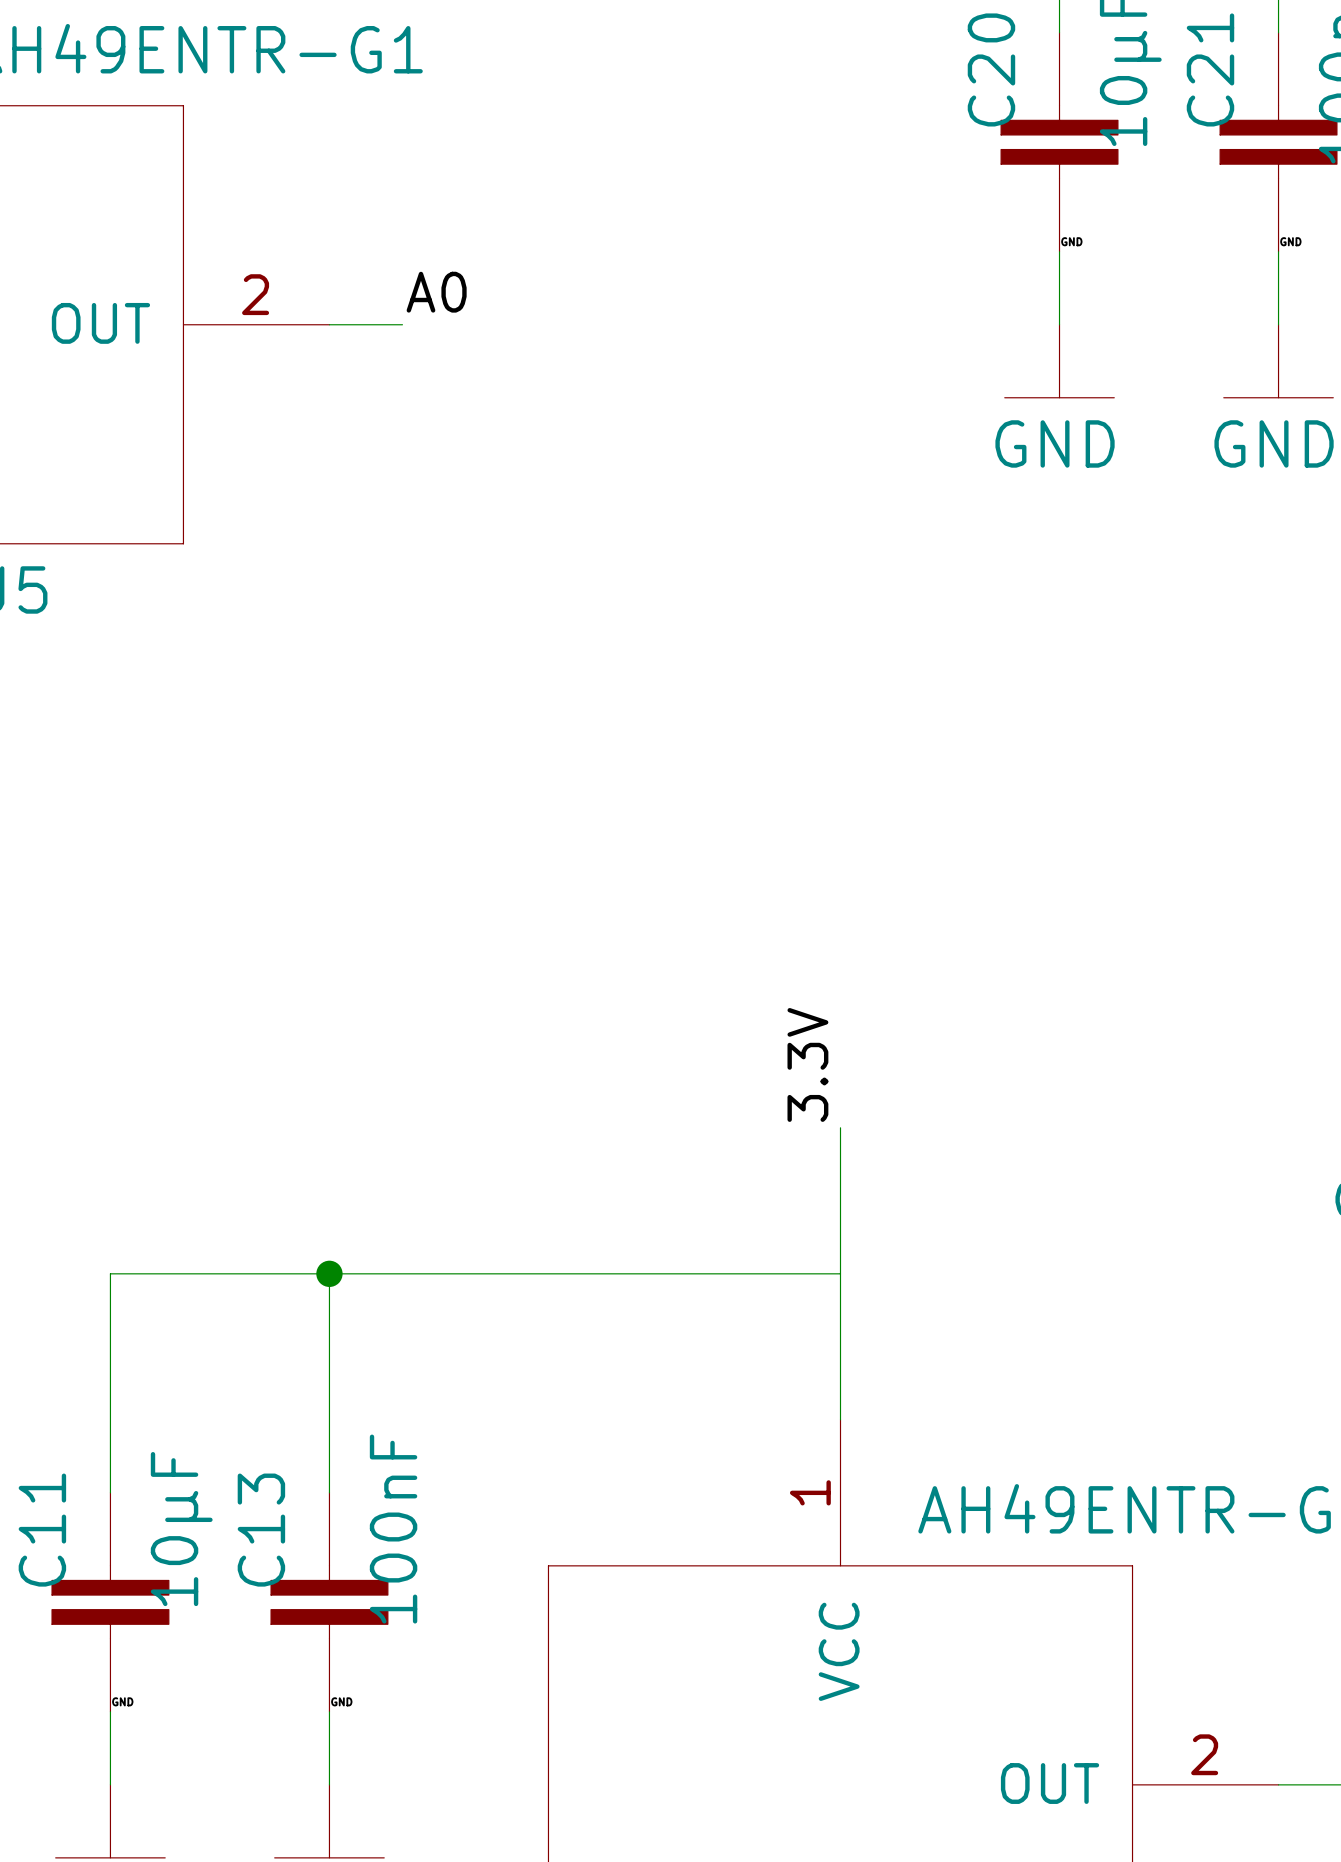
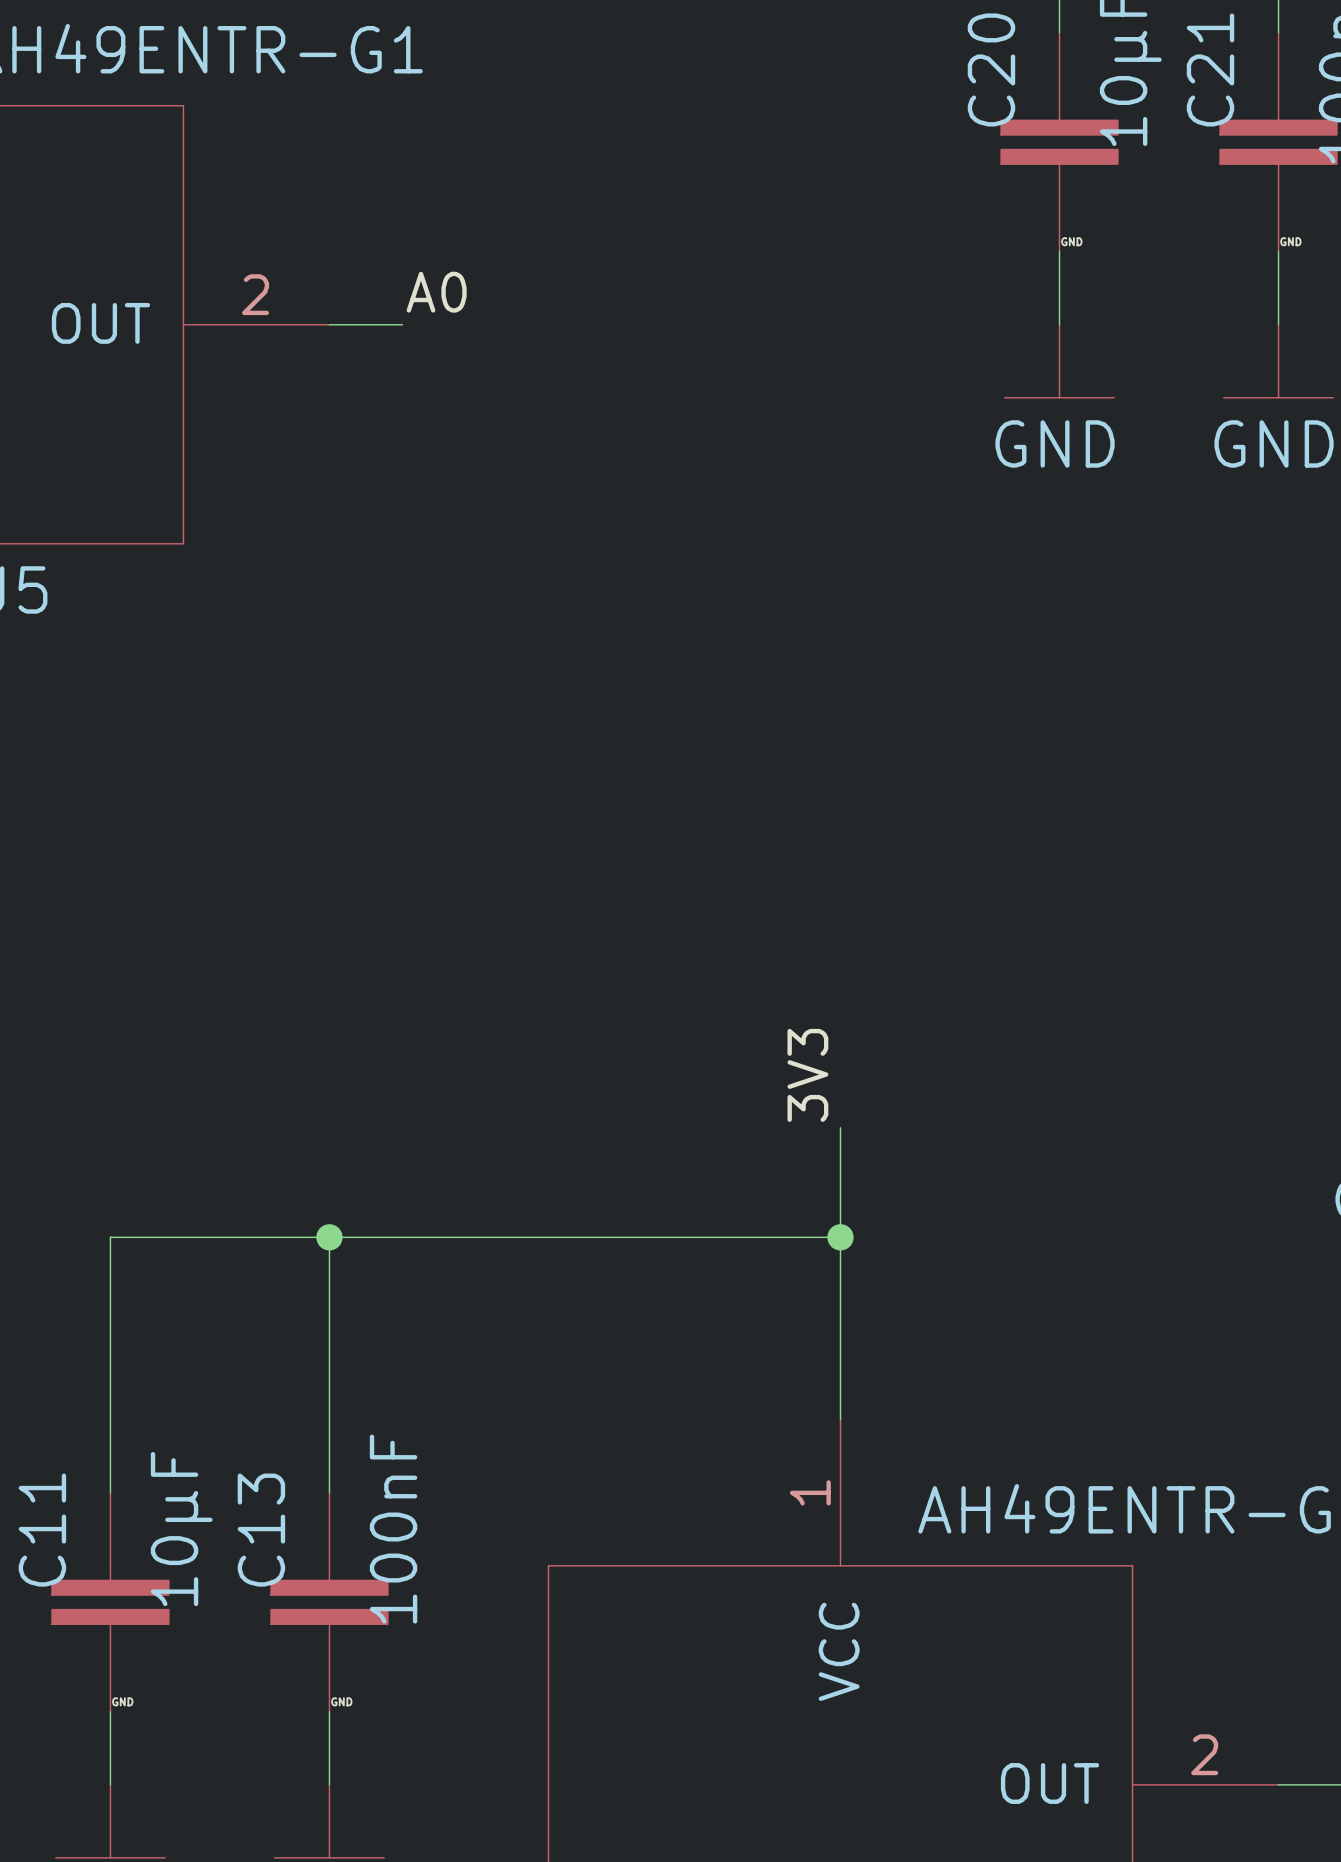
label: 3.3V (807, 1064) -> 3V3 (807, 1075)
wire: none -> (329, 1237) (329, 1273)
junction: none -> (840, 1237)
wire: (110, 1273) (840, 1273) -> (110, 1273) (110, 1237) (840, 1237)
junction position: (329, 1273) -> (329, 1237)

